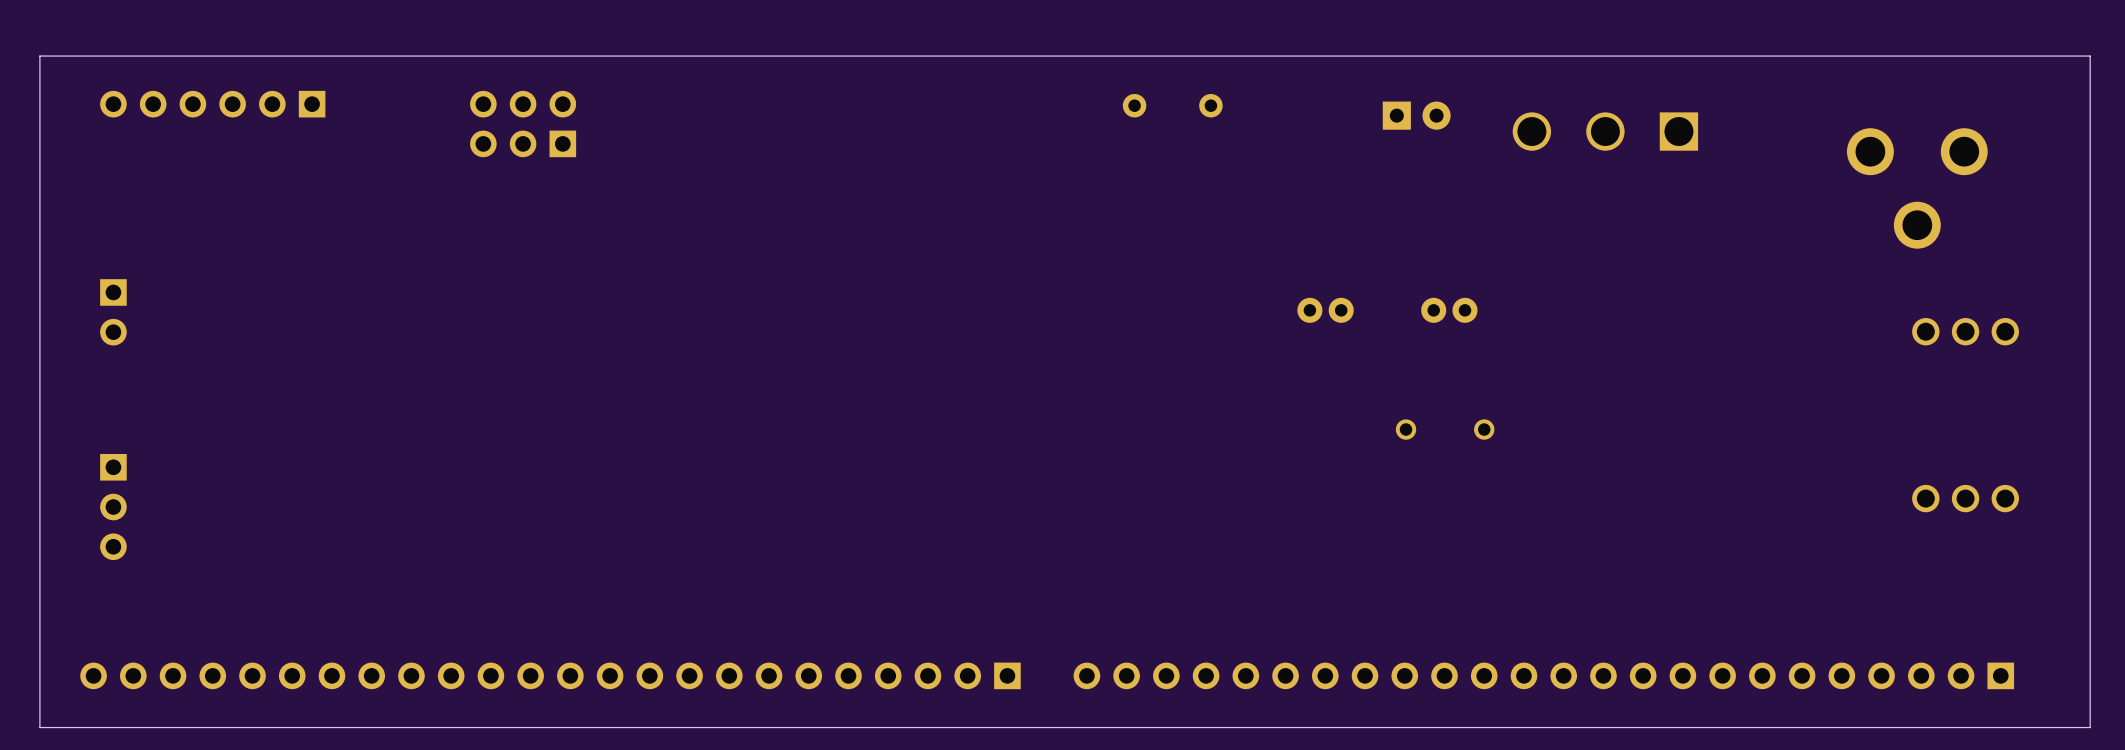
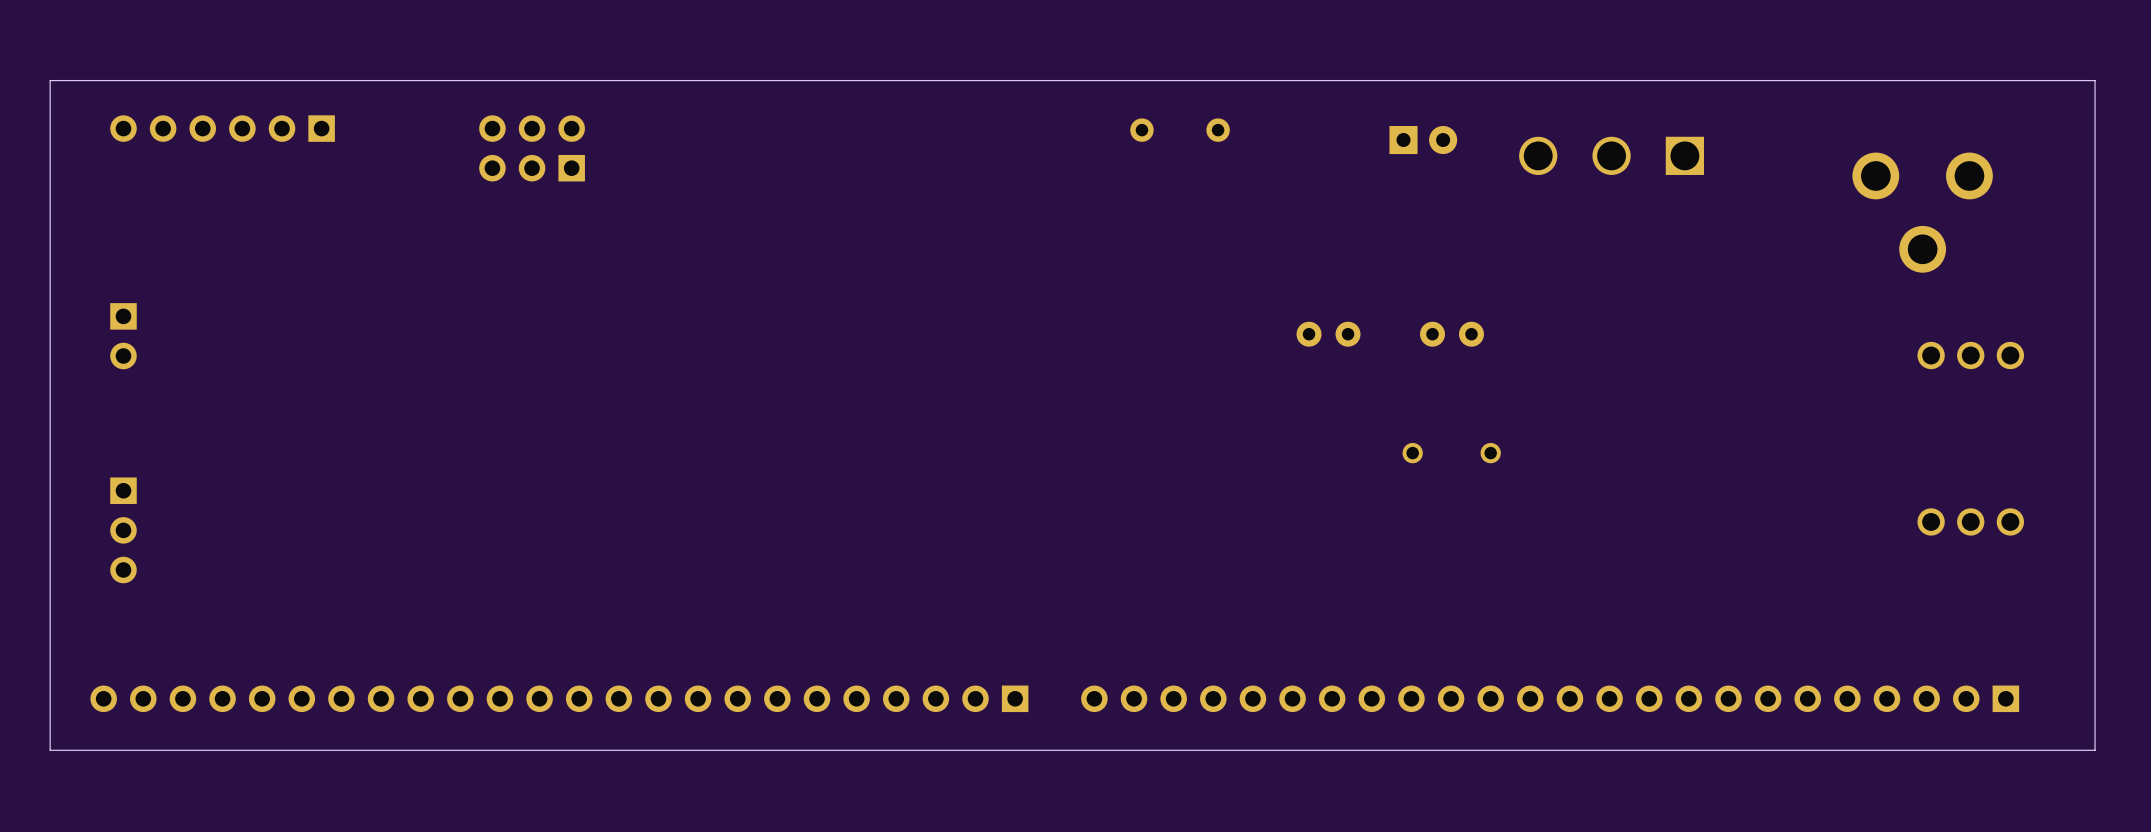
part footprint: [1297, 297, 1354, 323] -> [1296, 321, 1361, 347]
part footprint: [1421, 297, 1478, 323] -> [1420, 321, 1484, 347]

